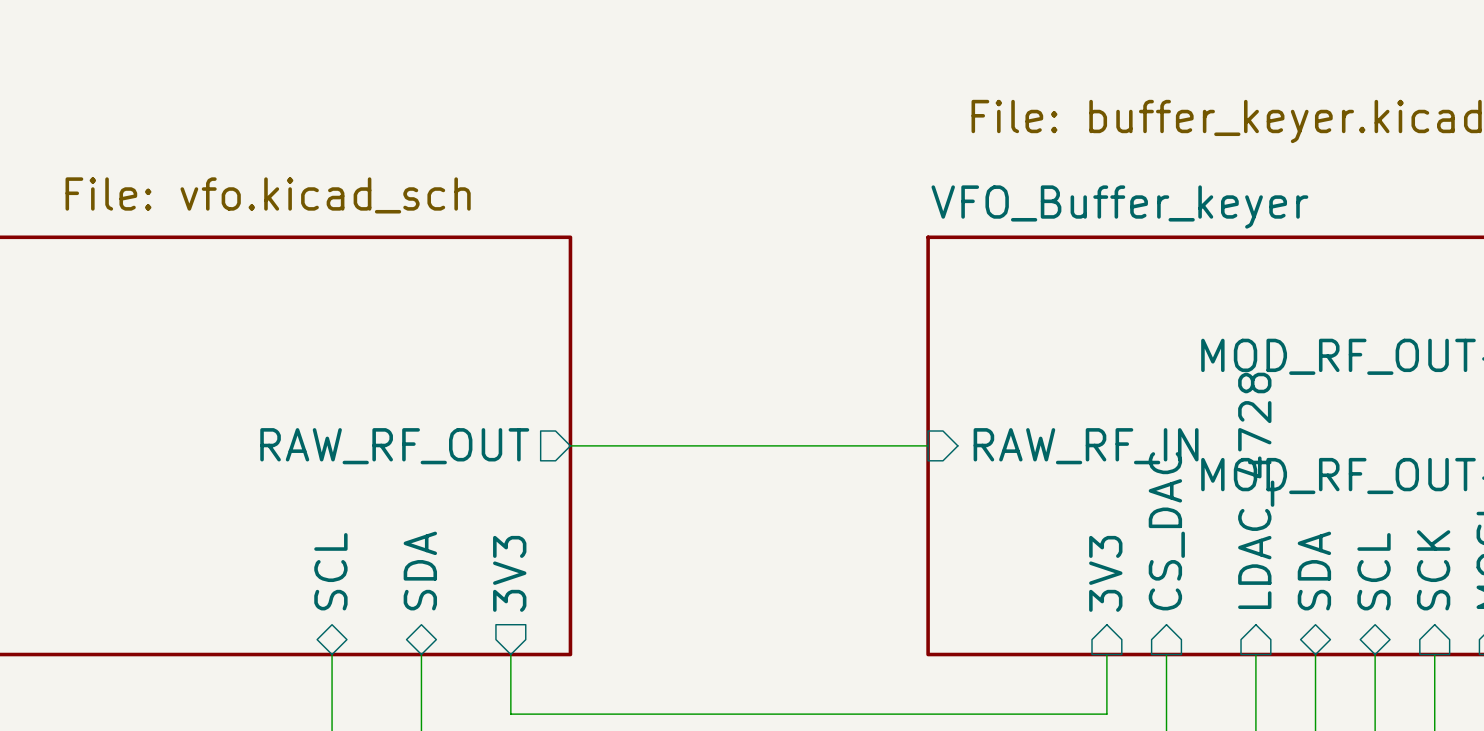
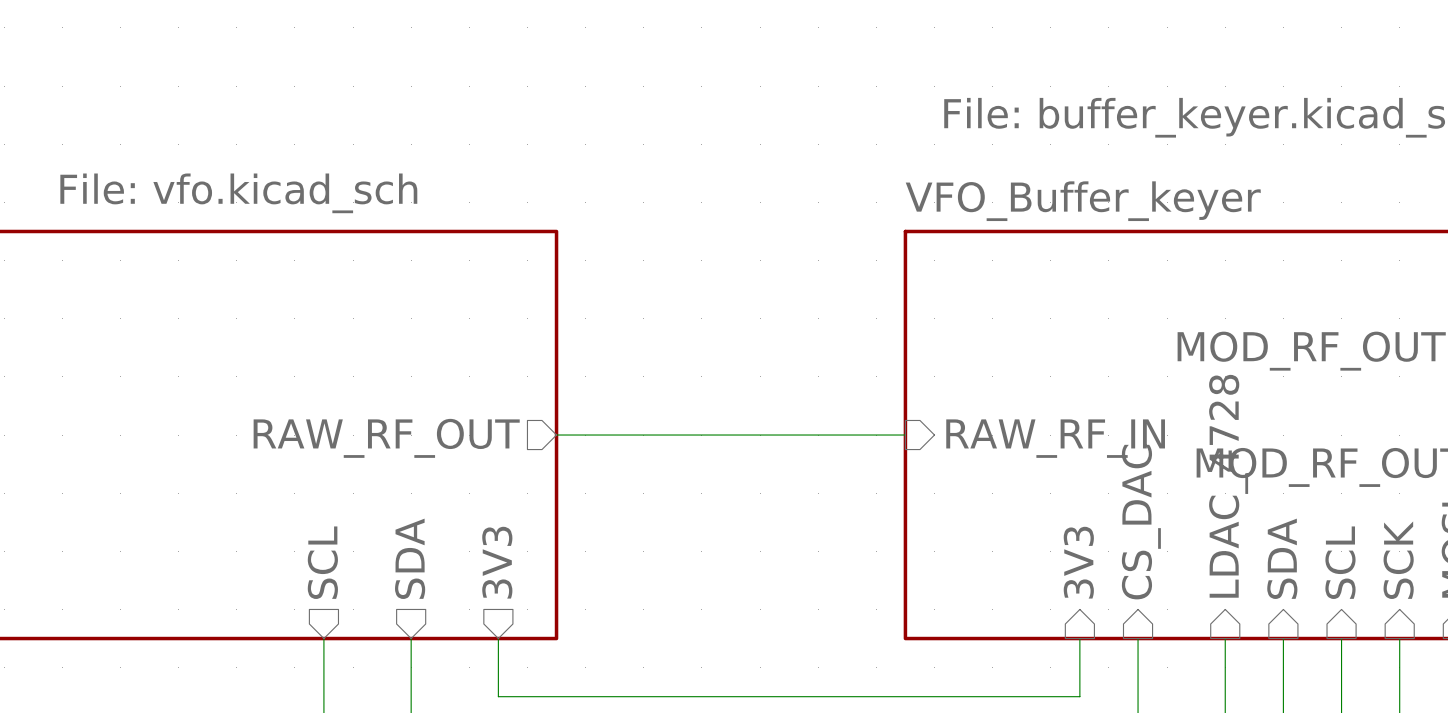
sheet pin shape: bidirectional (330, 571) -> output (322, 562)
sheet pin shape: bidirectional (420, 571) -> output (410, 558)
sheet pin shape: bidirectional (1314, 571) -> input (1282, 558)
sheet pin shape: bidirectional (1374, 571) -> input (1340, 562)

